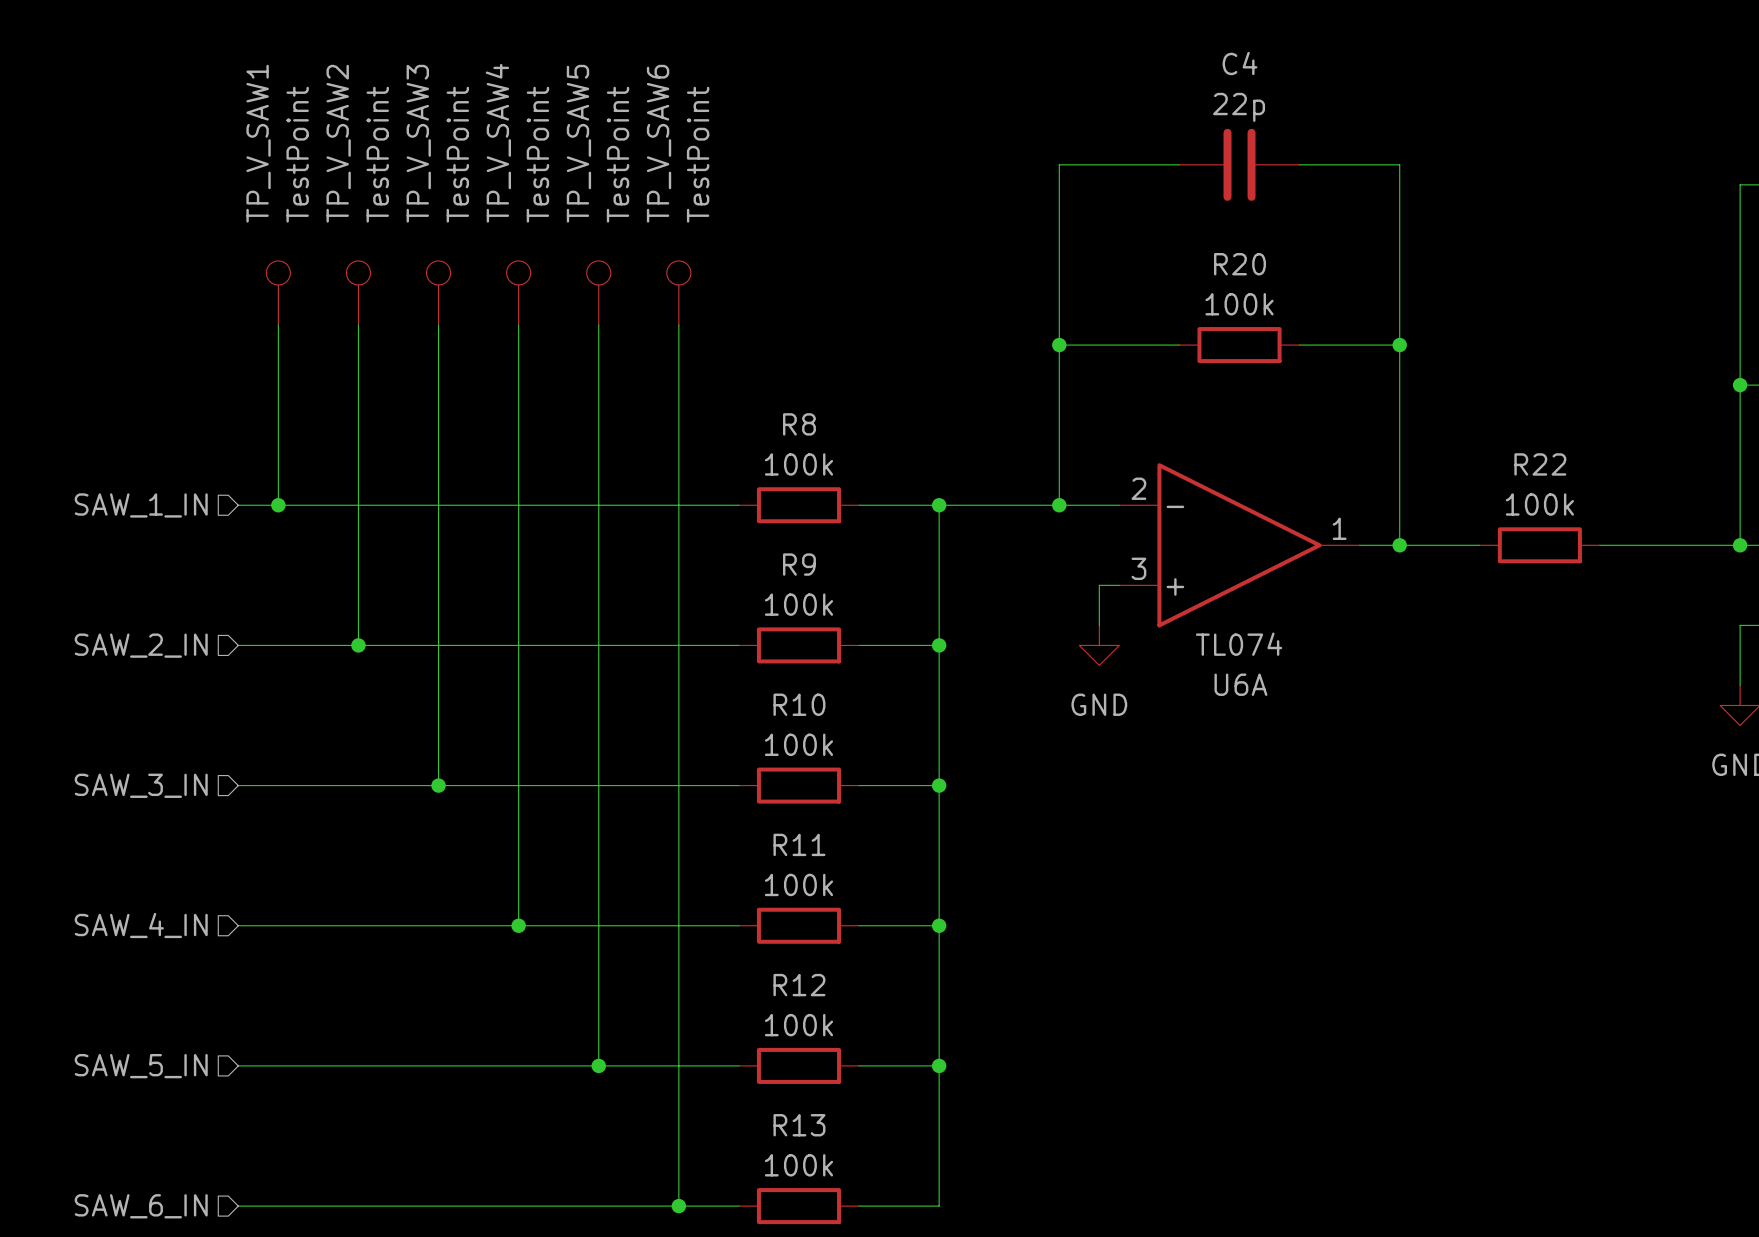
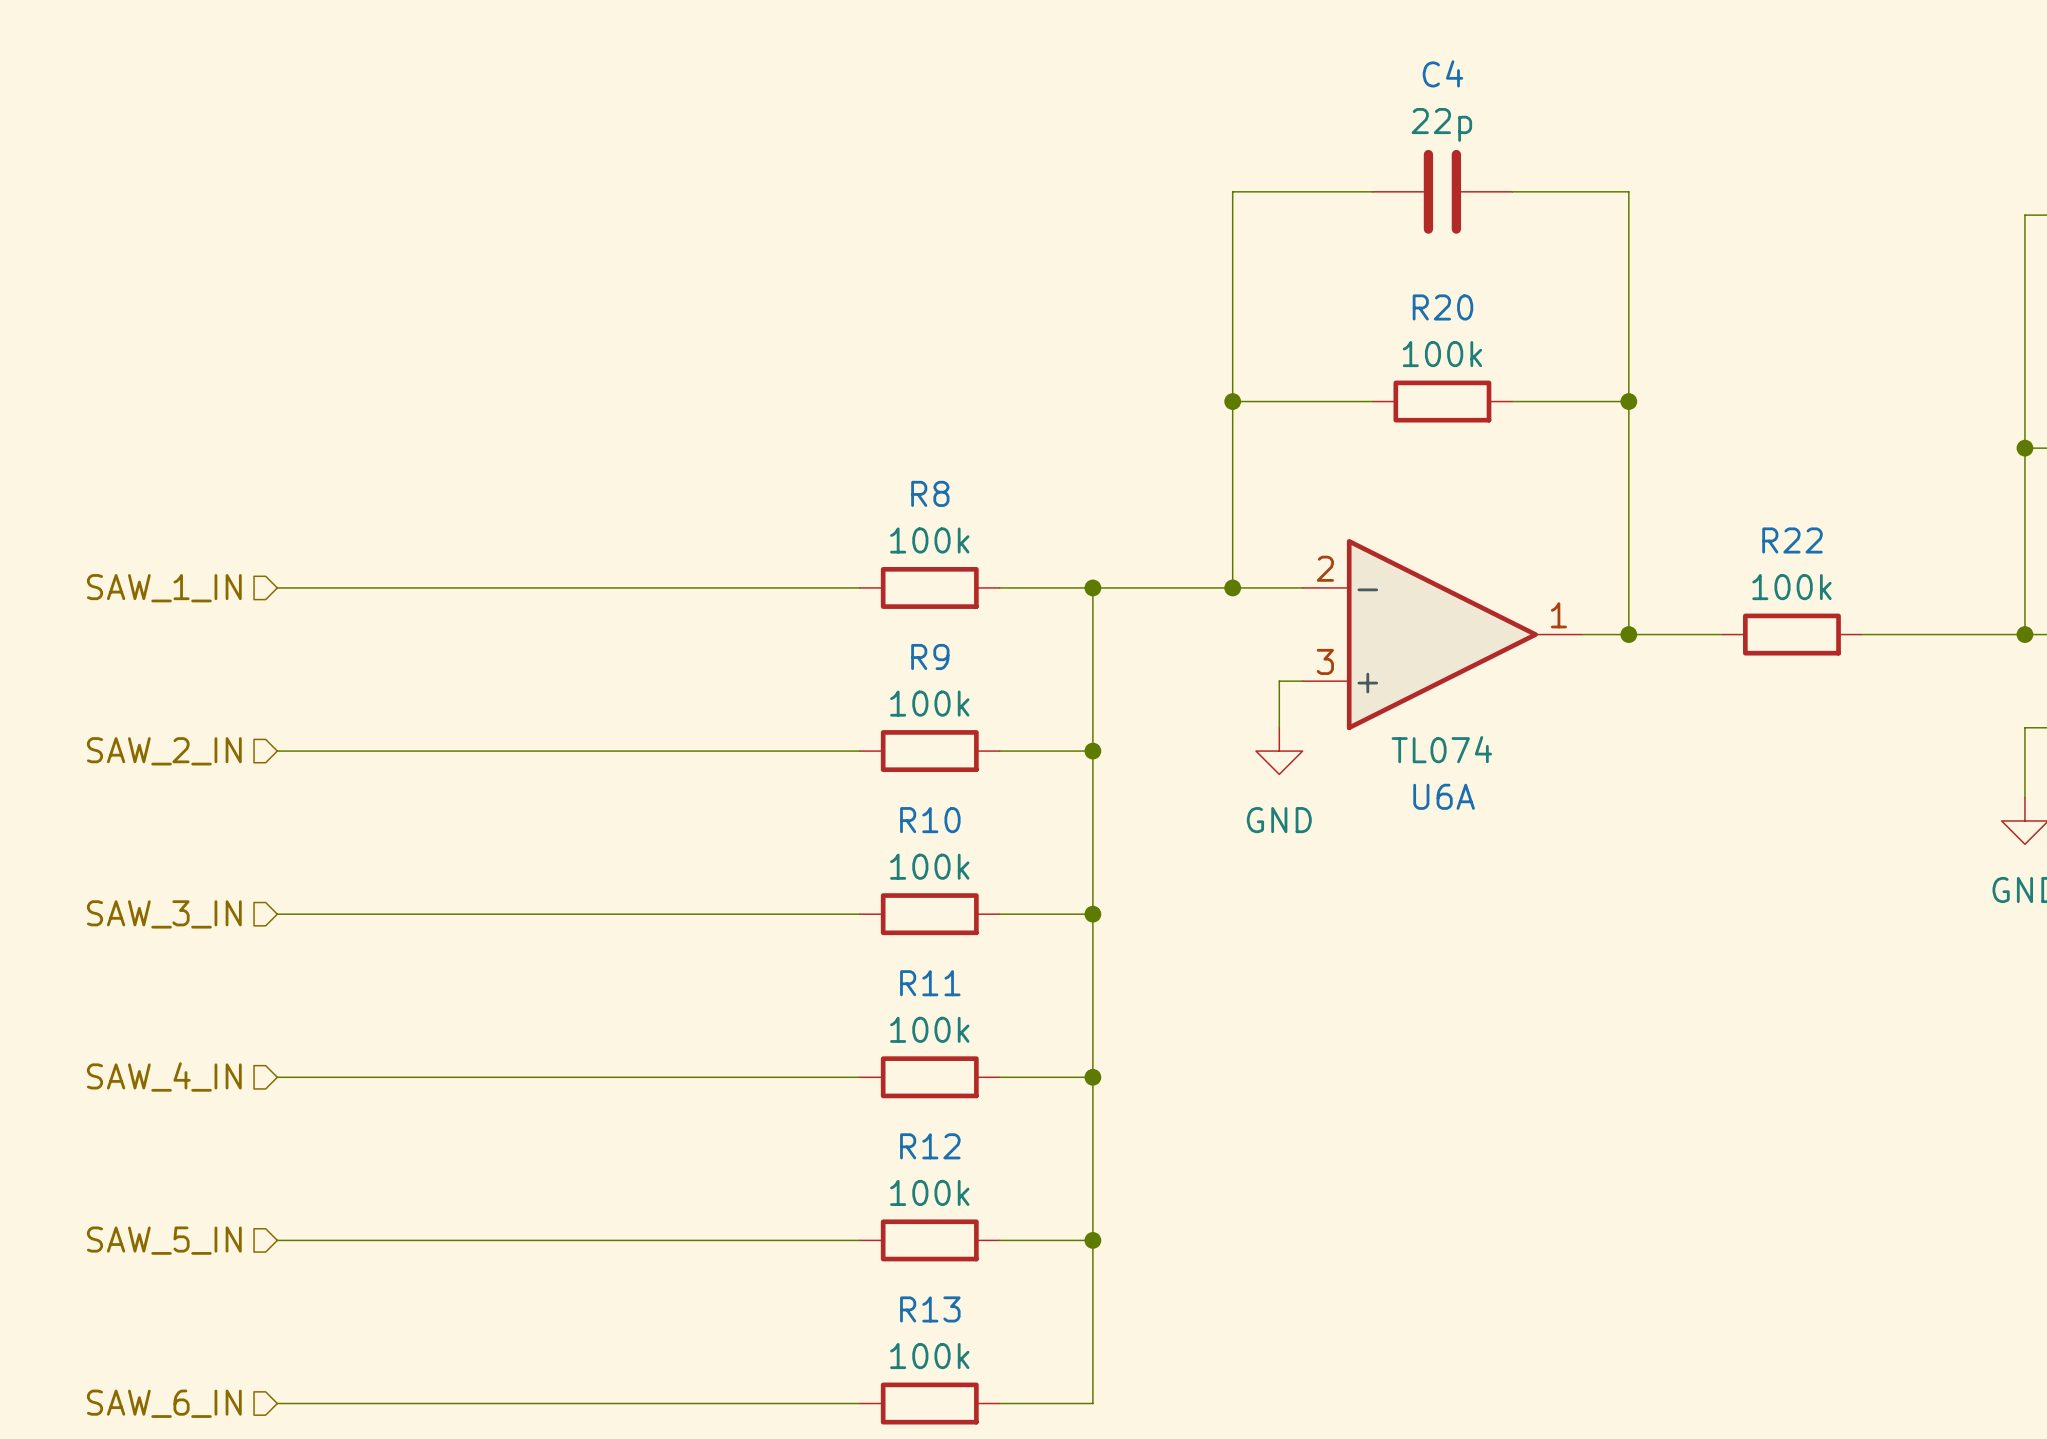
TP_V_SAW1: TestPoint (278, 292) -> none
TP_V_SAW2: TestPoint (358, 292) -> none
TP_V_SAW3: TestPoint (438, 292) -> none
TP_V_SAW4: TestPoint (518, 292) -> none
TP_V_SAW5: TestPoint (598, 292) -> none
TP_V_SAW6: TestPoint (678, 292) -> none
wire: (278, 325) (278, 505) -> none
wire: (358, 325) (358, 645) -> none
wire: (438, 325) (438, 785) -> none
wire: (518, 325) (518, 925) -> none
wire: (598, 325) (598, 1065) -> none
wire: (678, 325) (678, 1206) -> none
junction: (278, 505) -> none
junction: (358, 645) -> none
junction: (438, 785) -> none
junction: (518, 925) -> none
junction: (598, 1065) -> none
junction: (678, 1206) -> none

